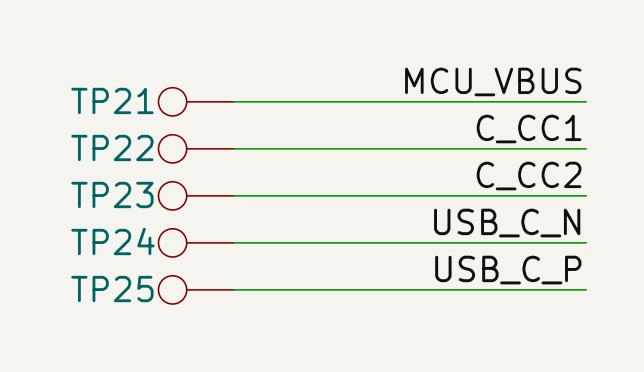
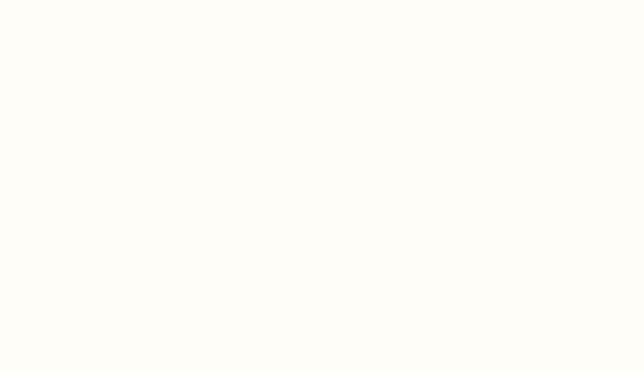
label: MCU_VBUS (493, 81) -> none
TP21: (196, 101) -> none
wire: (233, 101) (586, 101) -> none
label: C_CC1 (529, 129) -> none
TP22: (196, 148) -> none
wire: (233, 148) (586, 148) -> none
label: C_CC2 (529, 176) -> none
TP23: (196, 195) -> none
wire: (233, 195) (586, 195) -> none
label: USB_C_N (507, 223) -> none
TP24: (196, 242) -> none
wire: (233, 242) (586, 242) -> none
label: USB_C_P (508, 270) -> none
TP25: (196, 289) -> none
wire: (233, 289) (586, 289) -> none

